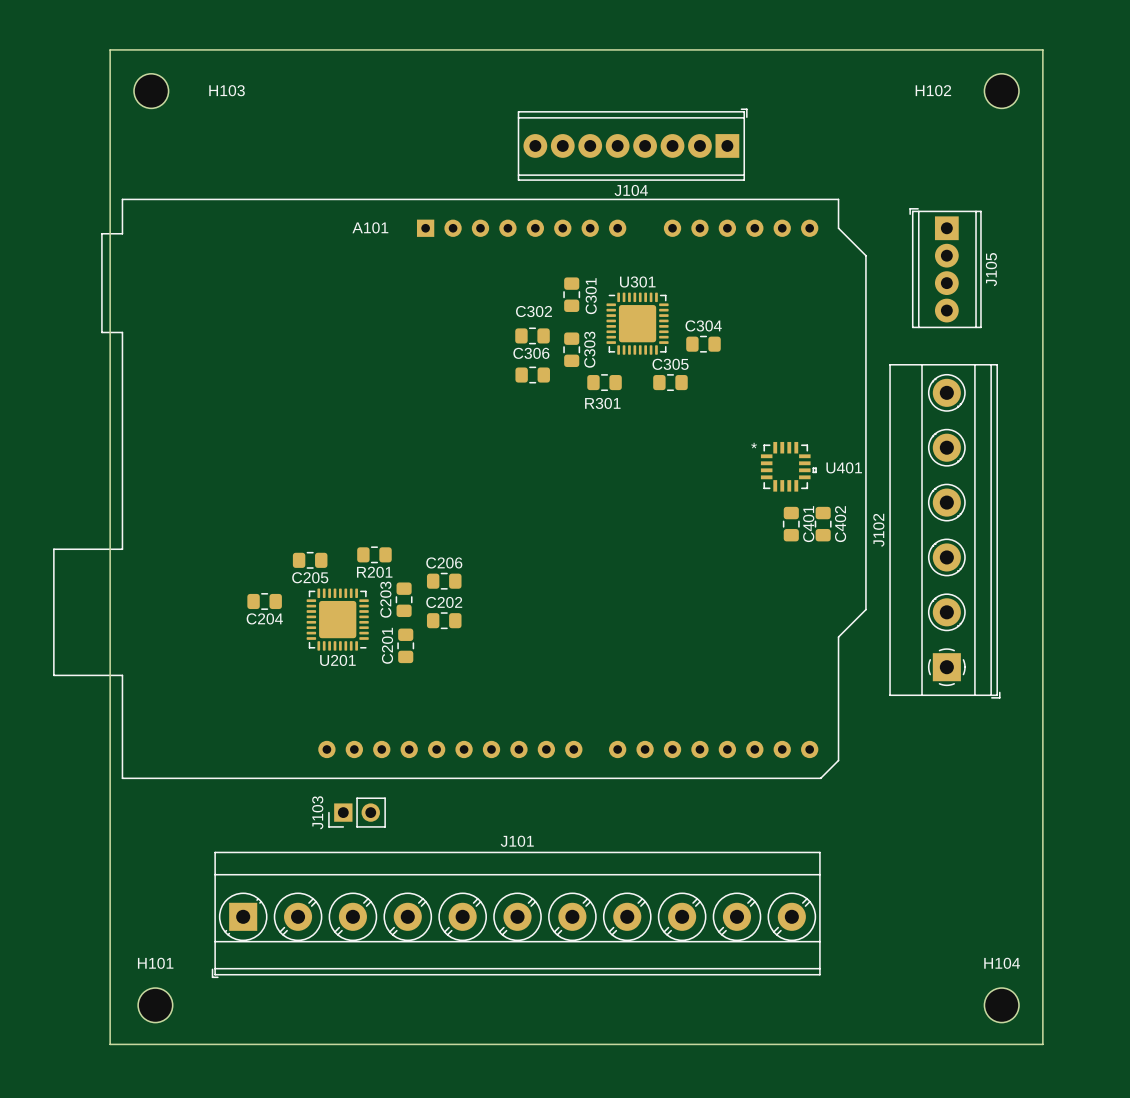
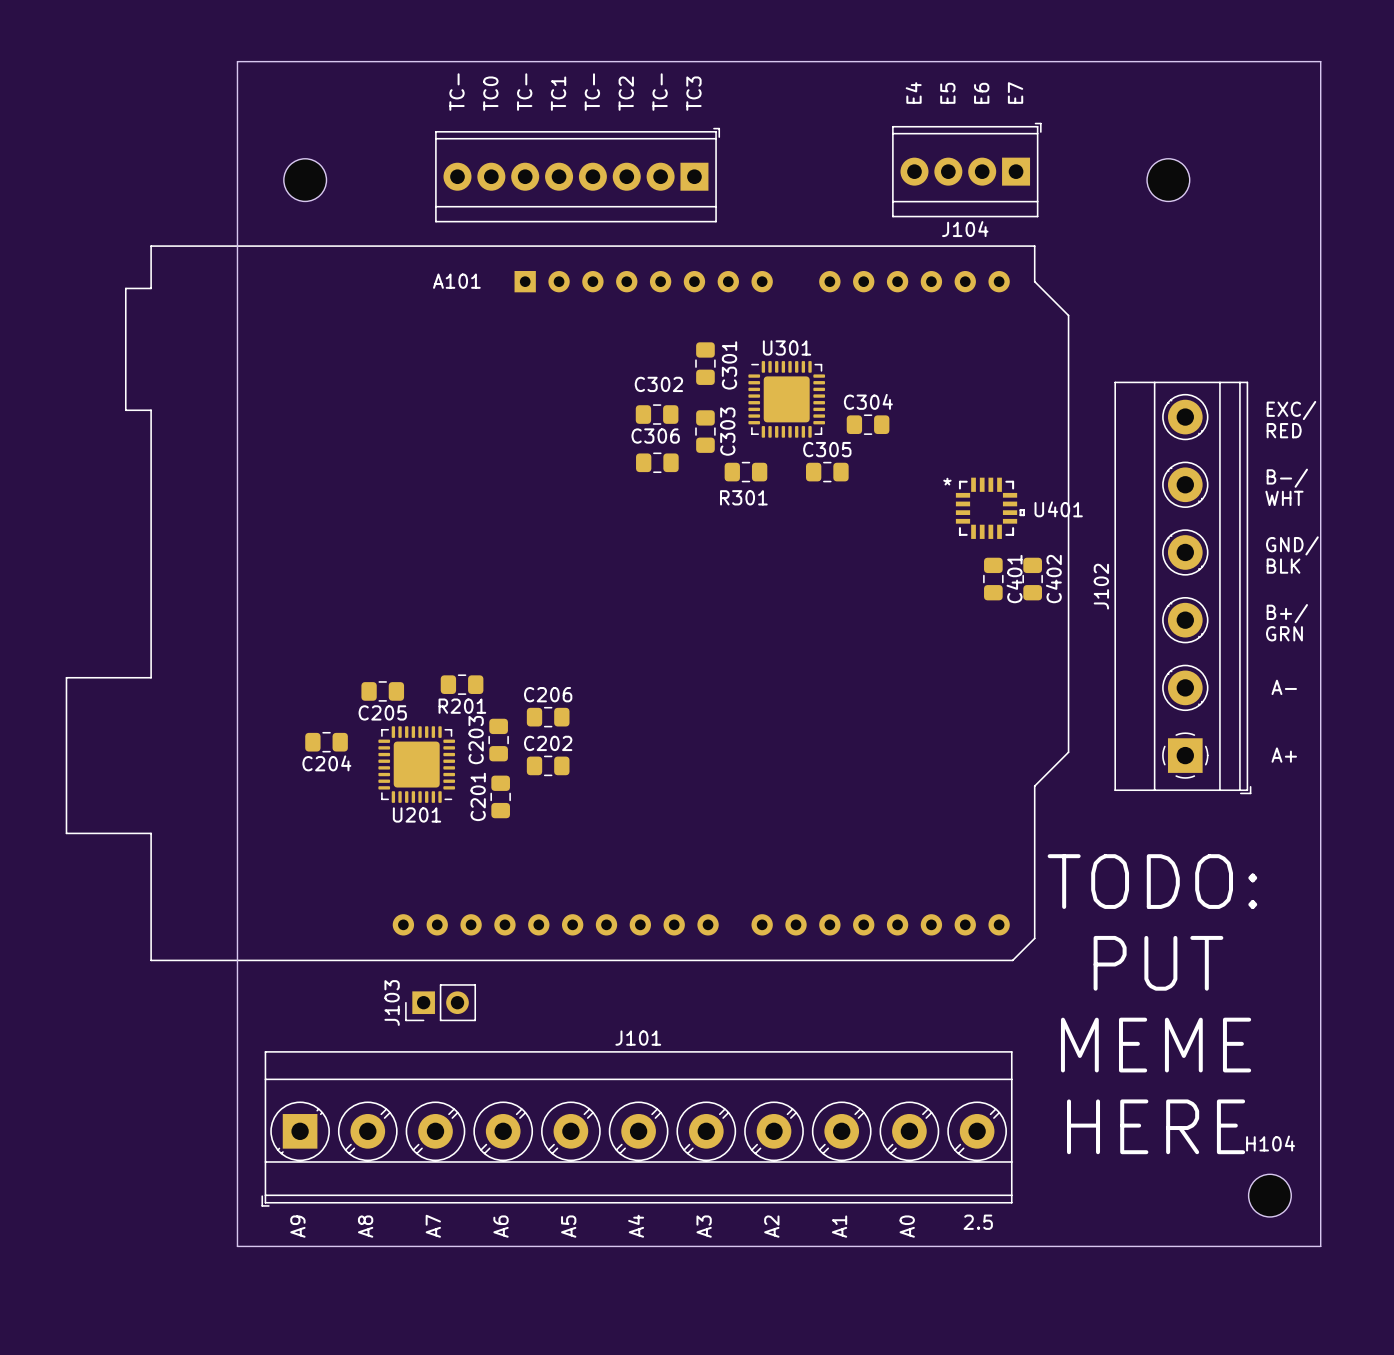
board edge: (192, 49) (110, 49) (110, 1044) (1042, 1044) (1042, 49) -> (237, 61) (237, 1246) (1320, 1246) (1320, 61) (1286, 61)
text: none -> TC0 (490, 93)
text: none -> TC1 (558, 93)
text: none -> TC2 (626, 93)
text: none -> TC3 (693, 93)
text: none -> E4 (913, 93)
text: none -> E5 (947, 93)
text: none -> E6 (981, 93)
text: none -> E7 (1015, 93)
text: none -> TC- (457, 92)
text: none -> TC- (524, 92)
text: none -> TC- (592, 92)
text: none -> TC- (660, 92)
H103: (151, 91) -> none
H102: (1001, 91) -> none
J104 footprint: [517, 108, 748, 181] -> [892, 122, 1042, 218]
part: none -> (577, 175)
part: none -> (305, 180)
part: none -> (1168, 180)
J105: (945, 268) -> none
text: none -> EXC/ (1291, 410)
text: none -> RED (1284, 430)
text: none -> B-/ (1287, 478)
text: none -> WHT (1284, 498)
text: none -> GND/ (1292, 545)
text: none -> BLK (1283, 566)
U401 position: (788, 466) -> (990, 508)
text: none -> B+/ (1287, 613)
text: none -> GRN (1284, 633)
C401 position: (791, 524) -> (993, 579)
C402 position: (823, 524) -> (1032, 579)
J102 position: (944, 531) -> (1182, 587)
text: none -> A- (1284, 687)
text: none -> A+ (1284, 755)
text: none -> TODO: (1152, 881)
text: none -> PUT (1158, 963)
text: none -> MEME (1156, 1045)
text: none -> HERE (1156, 1126)
text: none -> 2.5 (978, 1222)
text: none -> A9 (297, 1226)
text: none -> A8 (365, 1226)
text: none -> A7 (433, 1226)
text: none -> A6 (501, 1226)
text: none -> A5 (568, 1226)
text: none -> A4 (636, 1226)
text: none -> A3 (704, 1226)
text: none -> A2 (771, 1226)
text: none -> A1 (839, 1226)
text: none -> A0 (907, 1226)
H101: (155, 1005) -> none
H104 position: (1001, 1005) -> (1269, 1195)

